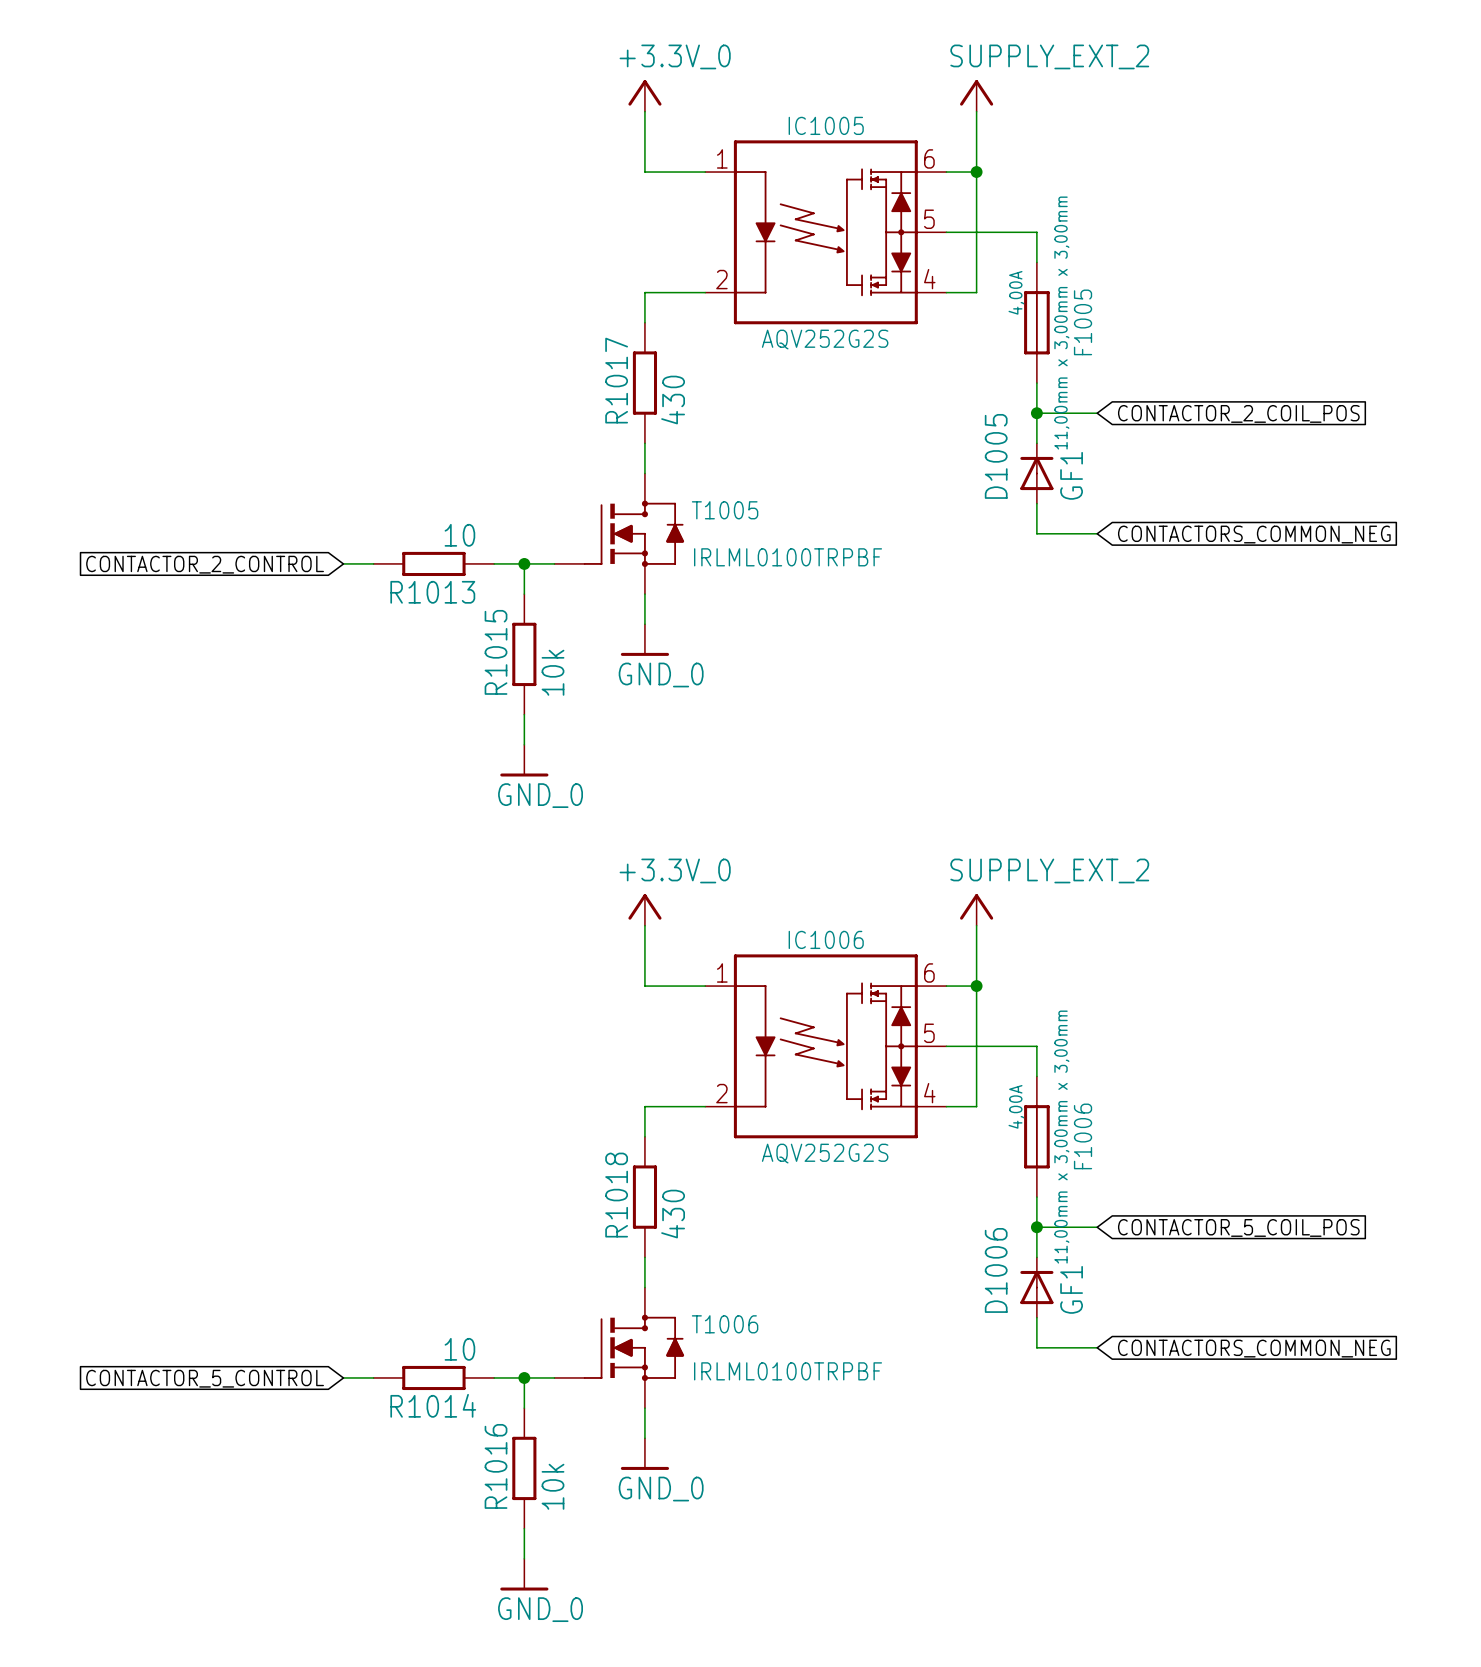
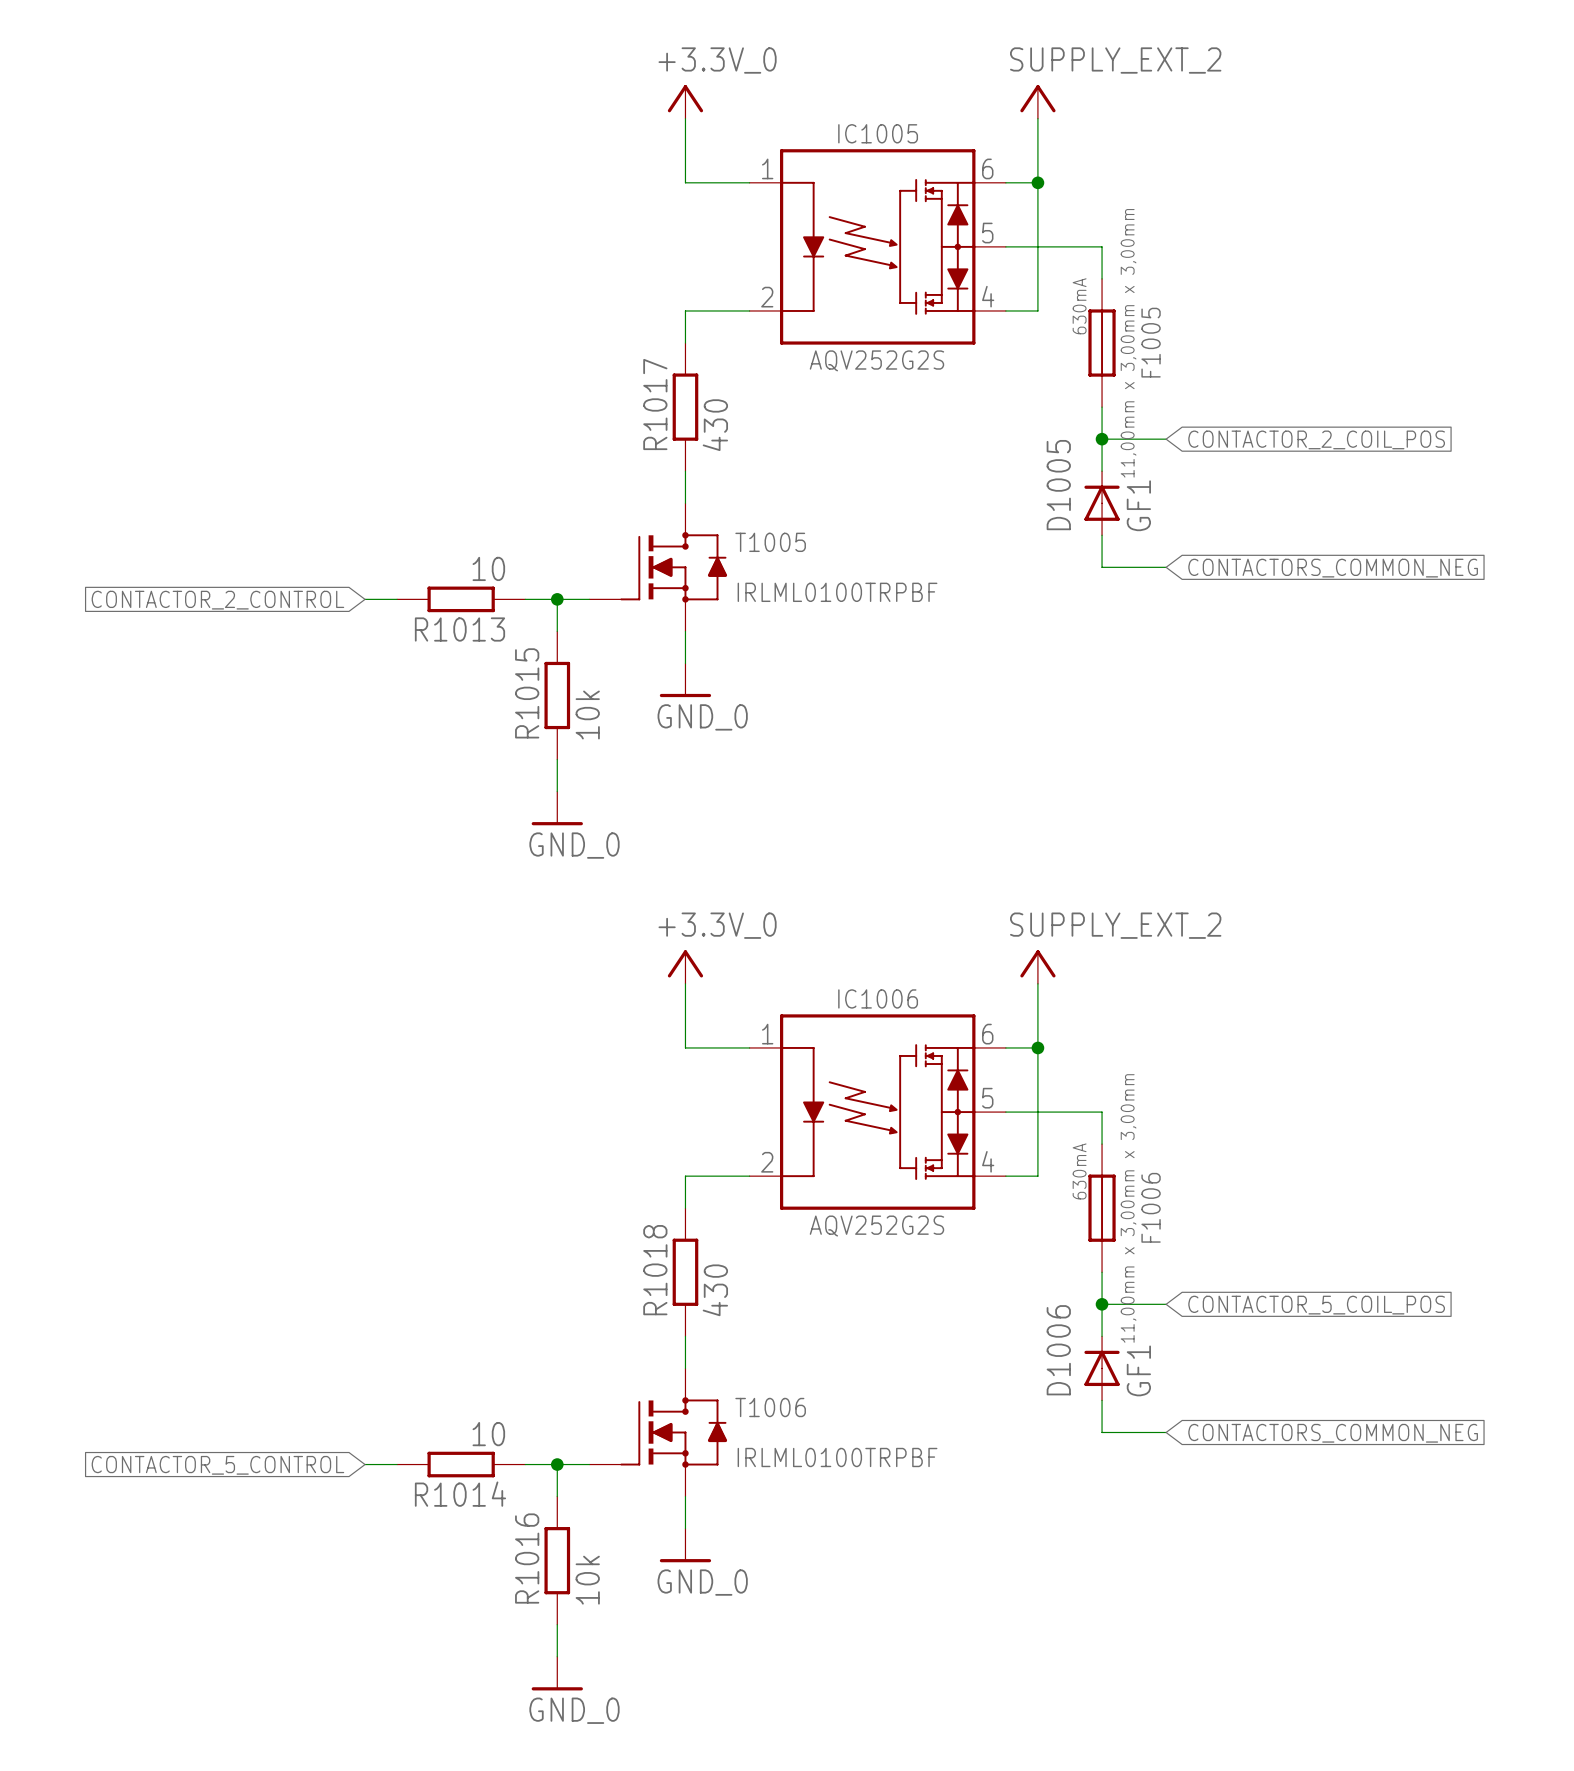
F1005 text: 4,00A (1016, 292) -> 630mA (1079, 306)
F1006 text: 4,00A (1016, 1106) -> 630mA (1079, 1171)

